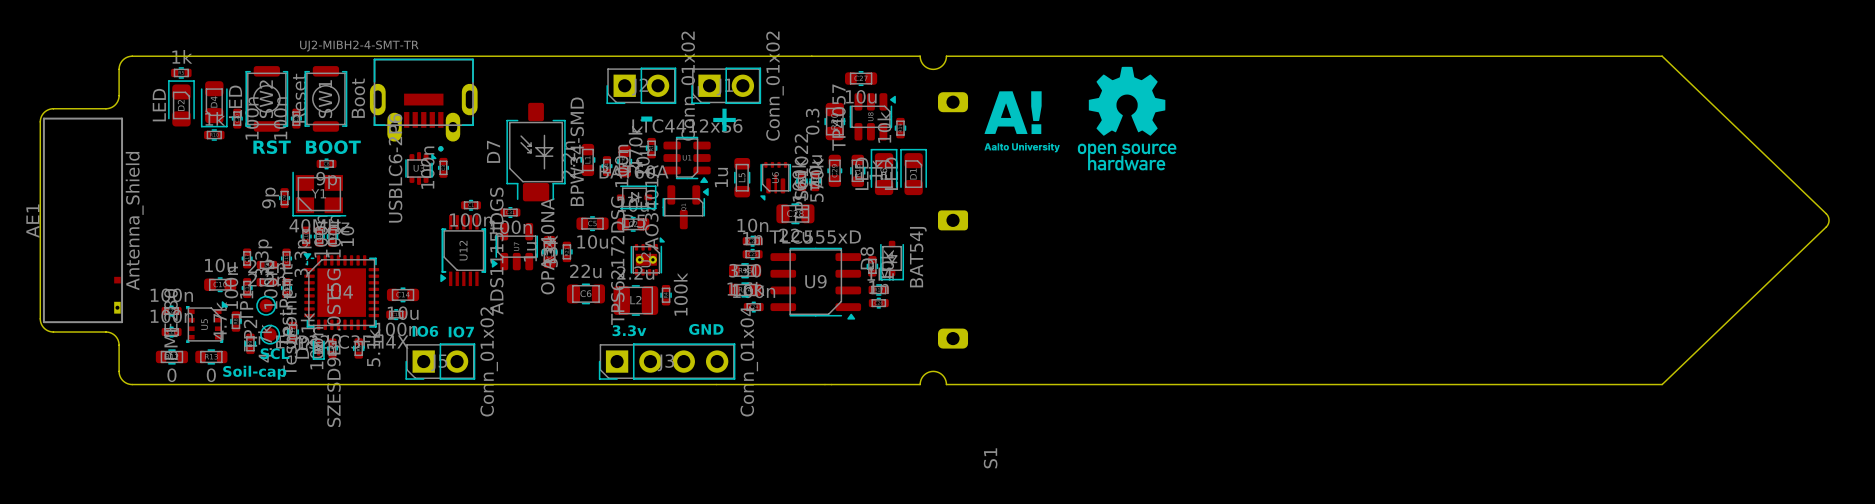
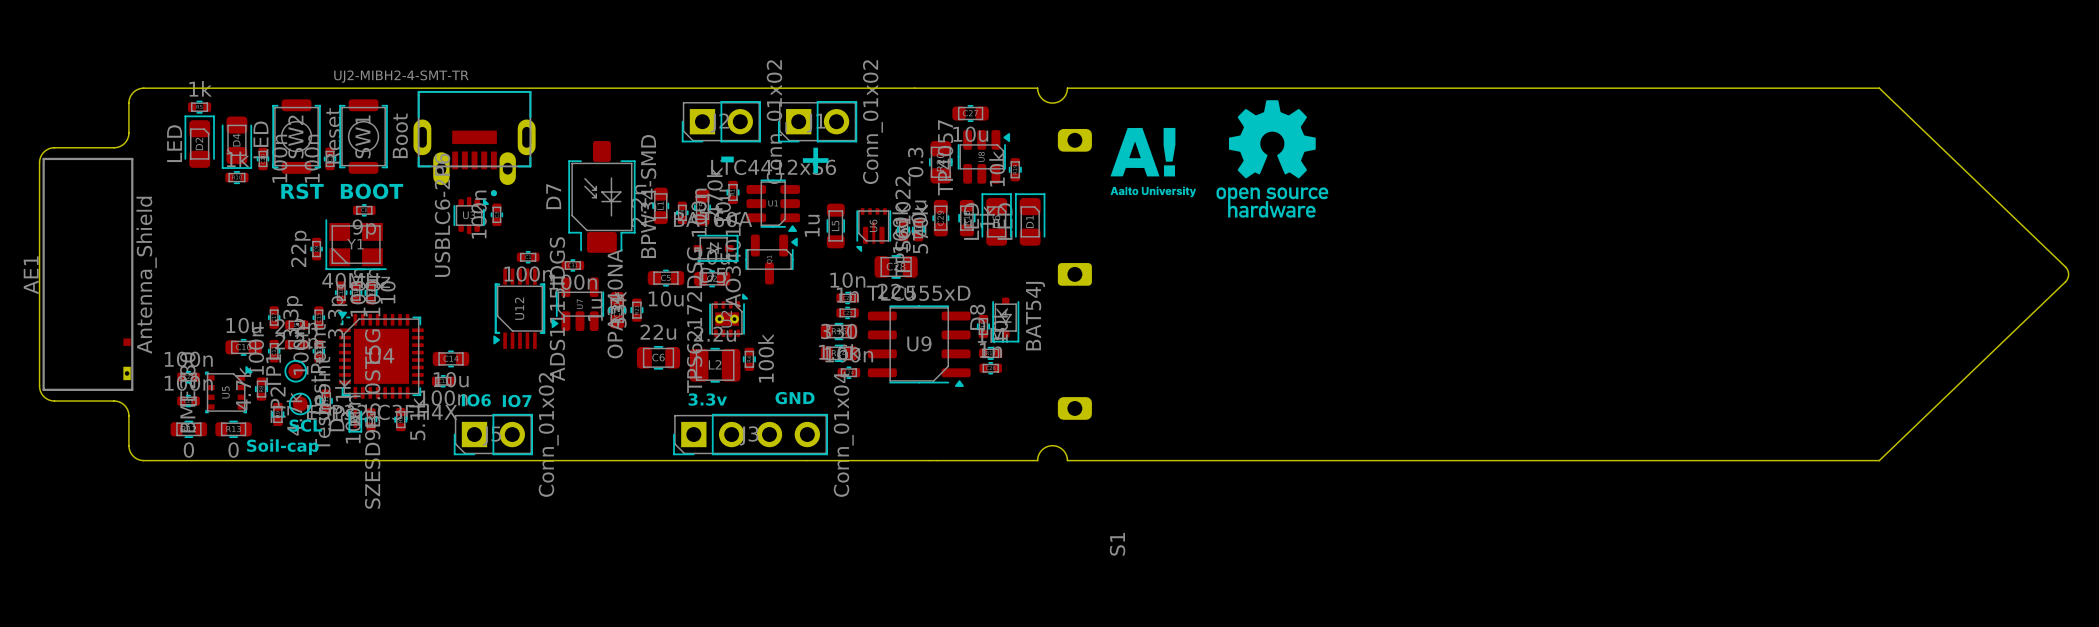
part value: 9p (270, 197) -> 22p (300, 248)

